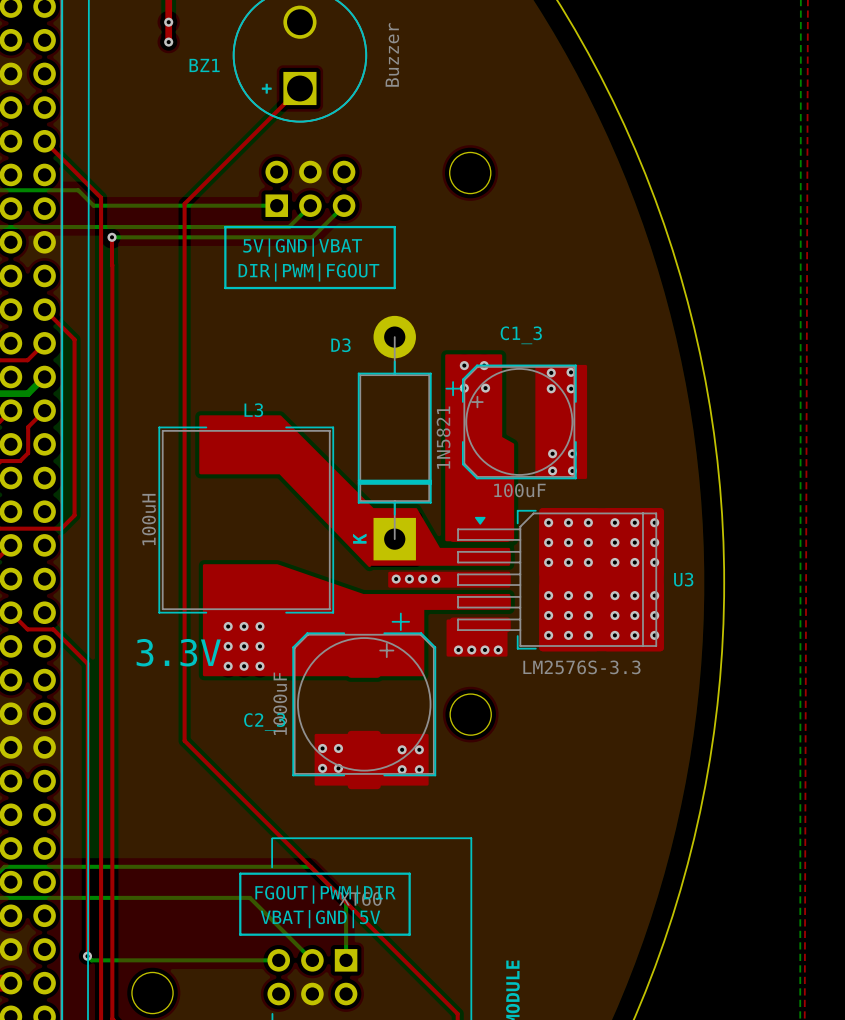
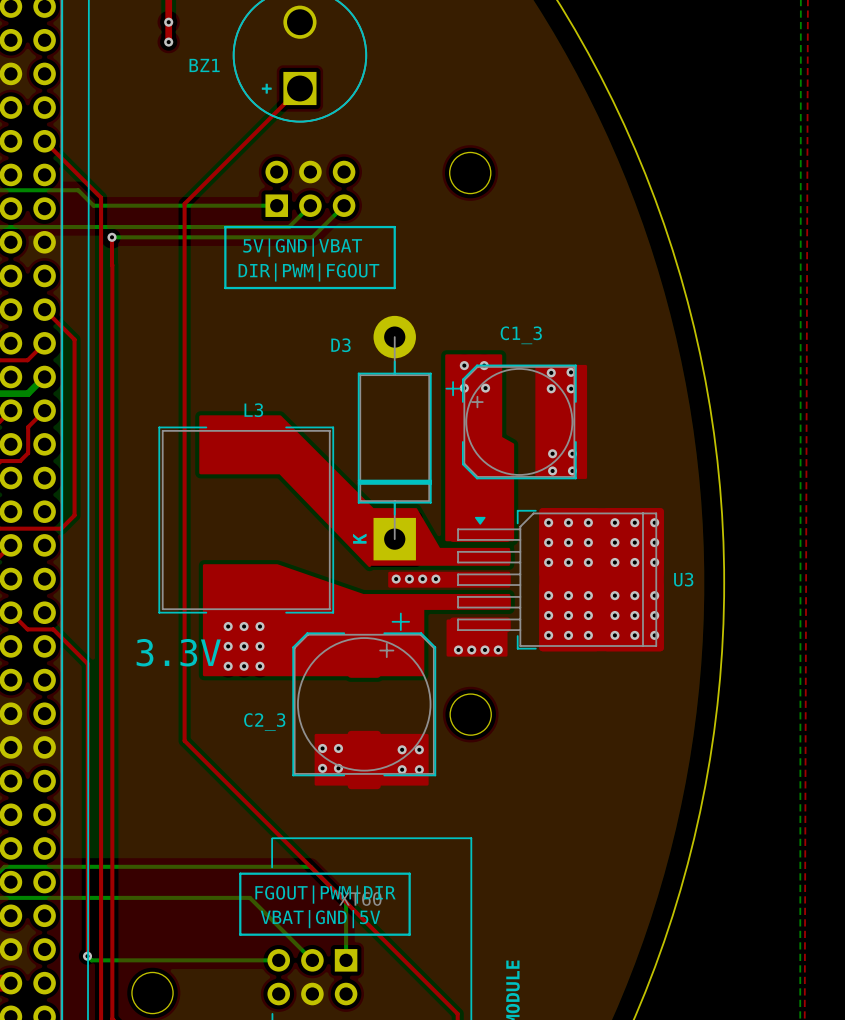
BZ1 value: Buzzer (392, 54) -> none
D3 value: 1N5821 (443, 437) -> none
C1_3 value: 100uF (519, 490) -> none
L3 value: 100uH (148, 519) -> none
U3 value: LM2576S-3.3 (581, 667) -> none
C2_3 value: 1000uF (280, 703) -> none

